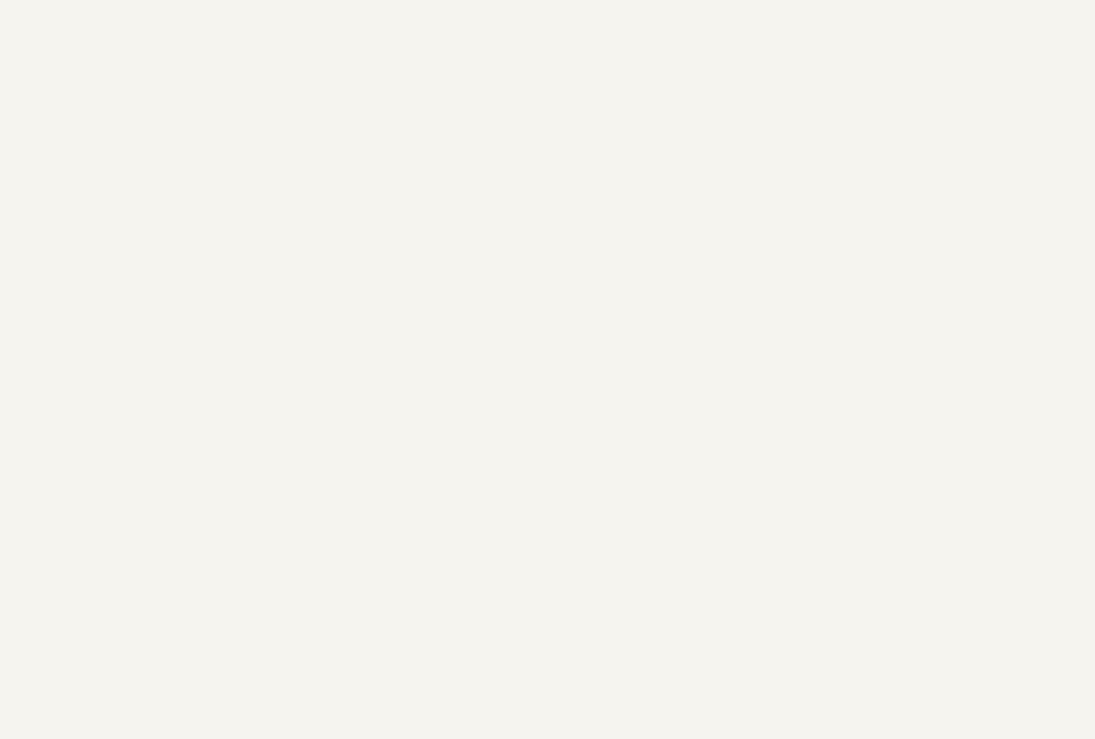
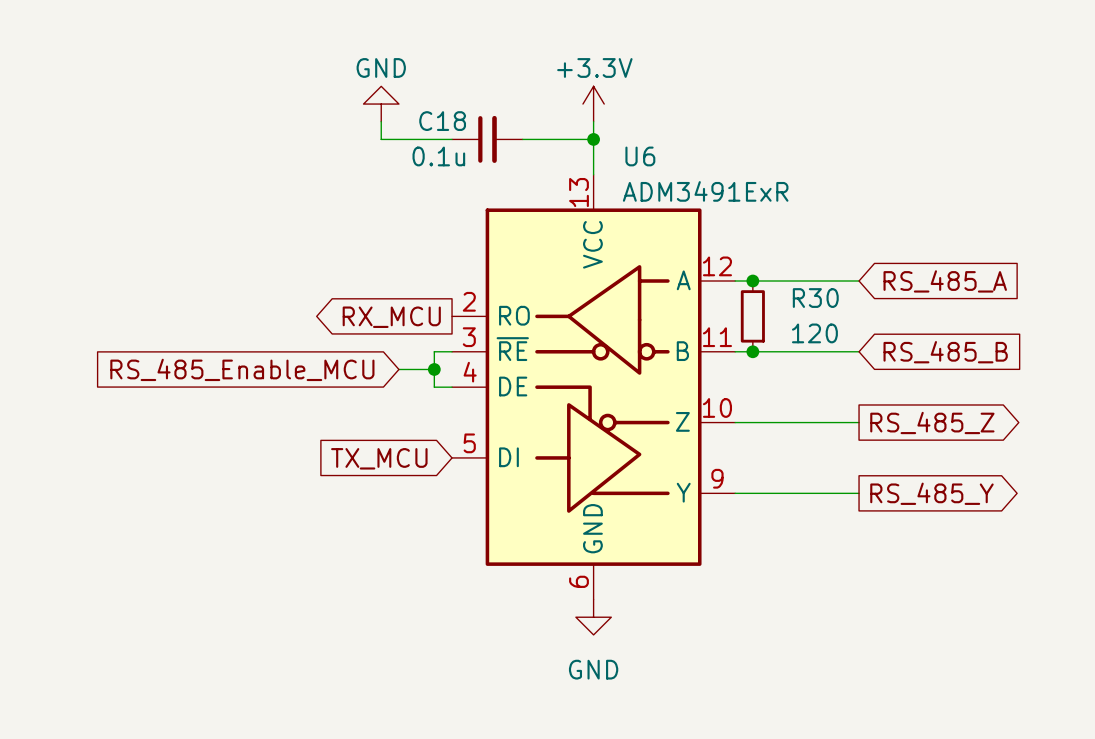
power symbol: none -> GND (381, 104)
power symbol: none -> +3.3V (593, 104)
wire: none -> (381, 121) (381, 139) (452, 139)
wire: none -> (593, 121) (593, 174)
C18: none -> 0.1u (487, 139)
wire: none -> (522, 139) (593, 139)
junction: none -> (593, 139)
wire: none -> (735, 280) (859, 280)
junction: none -> (752, 280)
global label: none -> RS_485_A (945, 281)
R30: none -> 120 (752, 316)
global label: none -> RX_MCU (391, 317)
wire: none -> (452, 351) (434, 351) (434, 387) (452, 387)
wire: none -> (735, 351) (859, 351)
junction: none -> (752, 351)
global label: none -> RS_485_B (945, 352)
global label: none -> RS_485_Enable_MCU (242, 369)
wire: none -> (398, 369) (434, 369)
junction: none -> (434, 369)
U6: none -> ADM3491ExR (593, 387)
wire: none -> (735, 422) (859, 422)
global label: none -> RS_485_Z (932, 422)
global label: none -> TX_MCU (379, 458)
wire: none -> (735, 493) (859, 493)
global label: none -> RS_485_Y (931, 493)
power symbol: none -> GND (593, 617)

